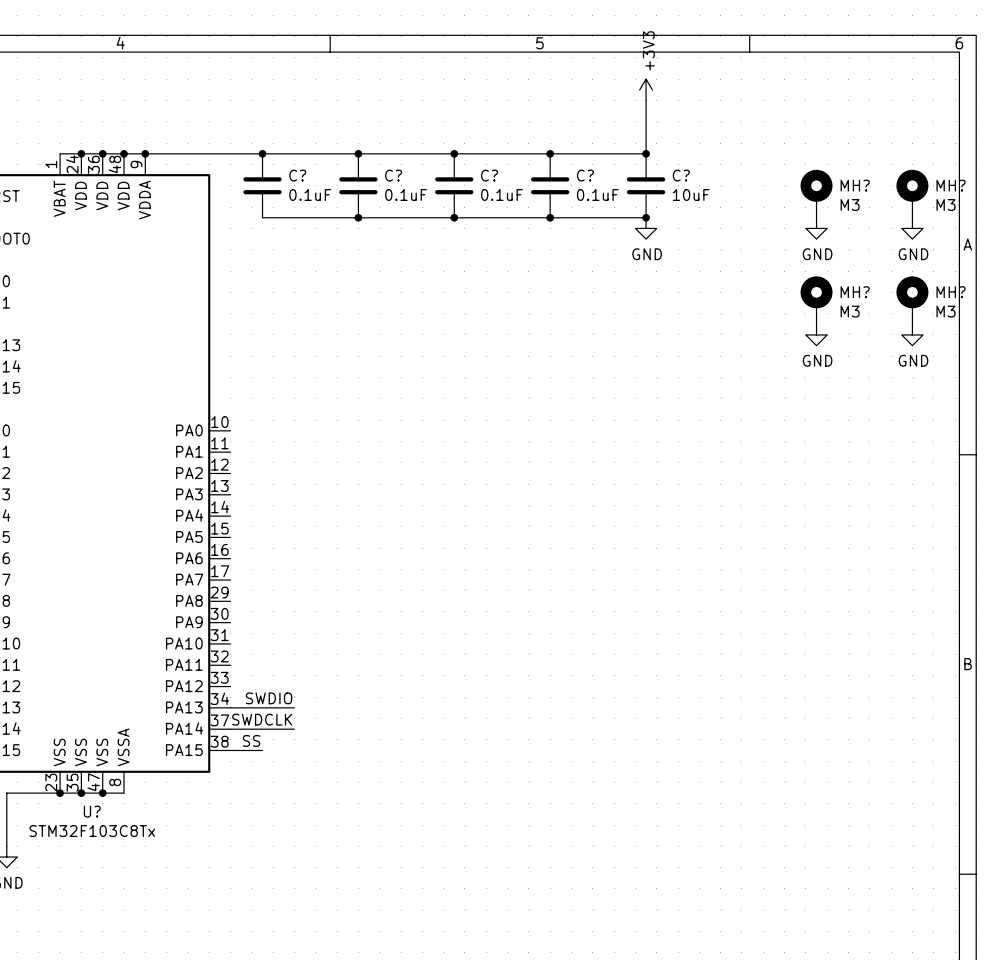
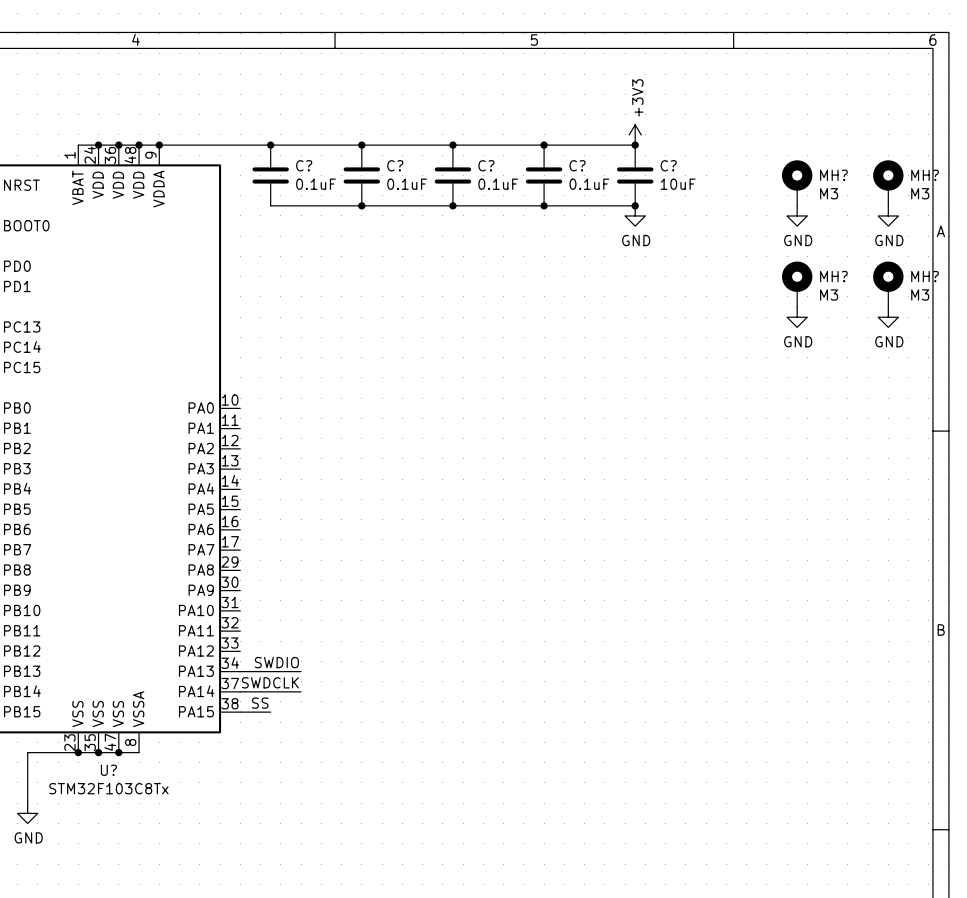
power symbol position: +3V3 (646, 89) -> +3V3 (635, 134)
wire: (646, 100) (646, 153) -> none

